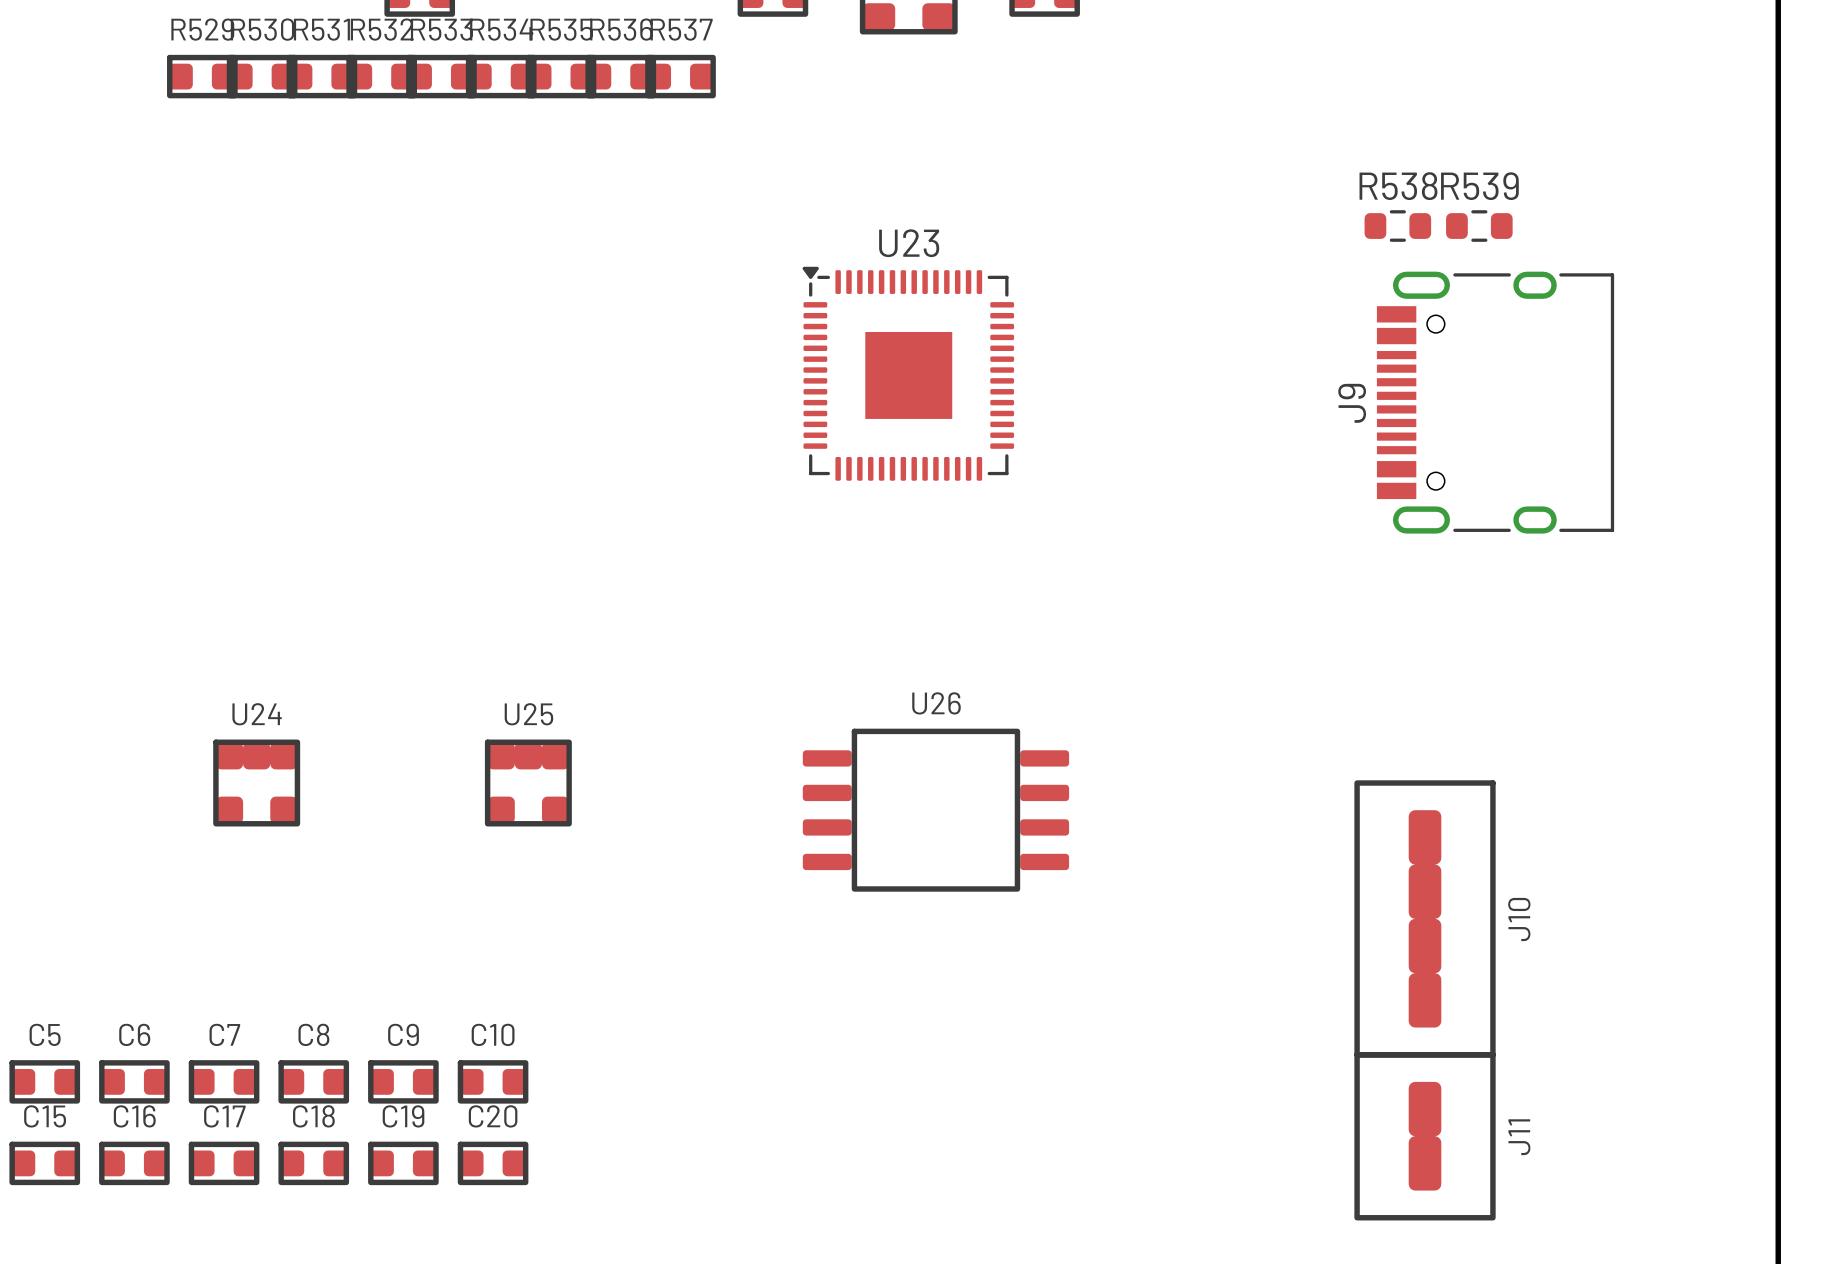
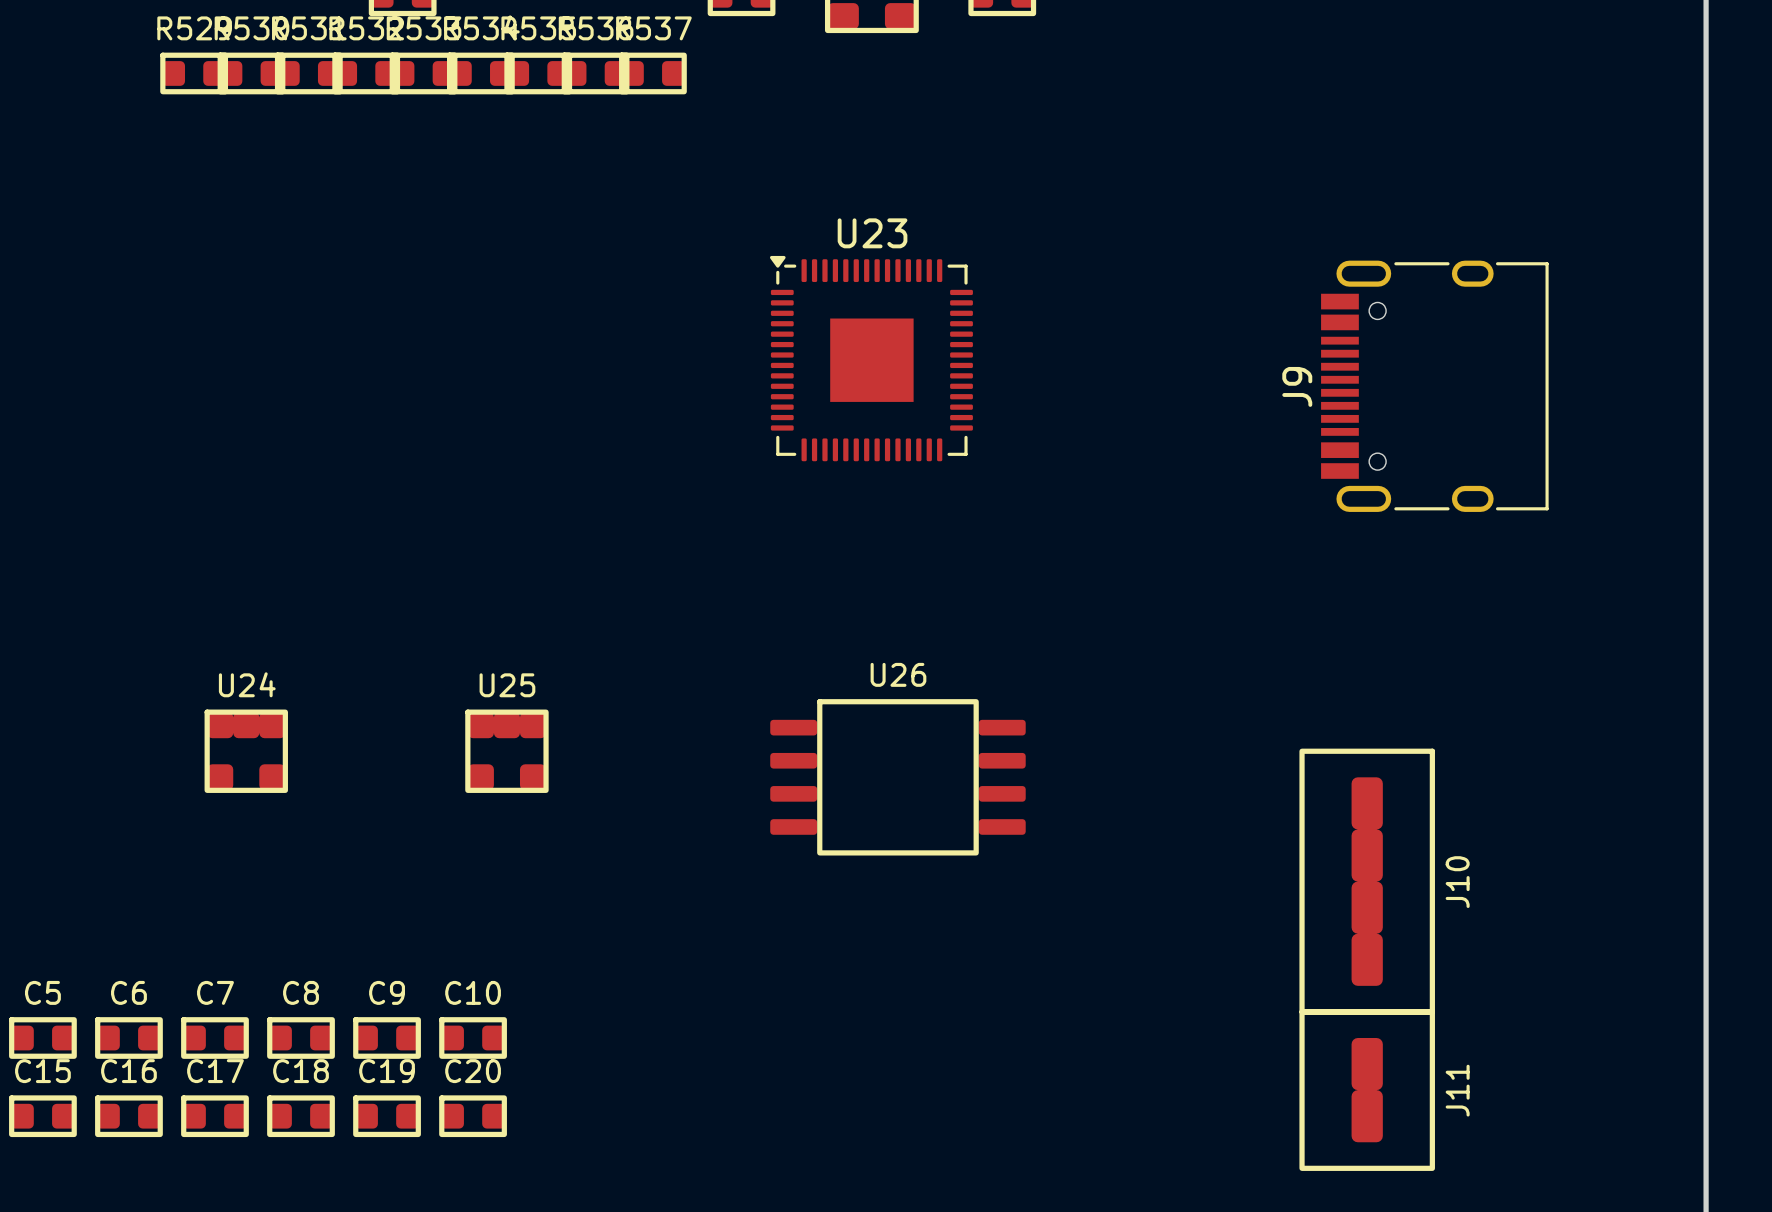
R538: (1397, 226) -> none
R539: (1479, 226) -> none

